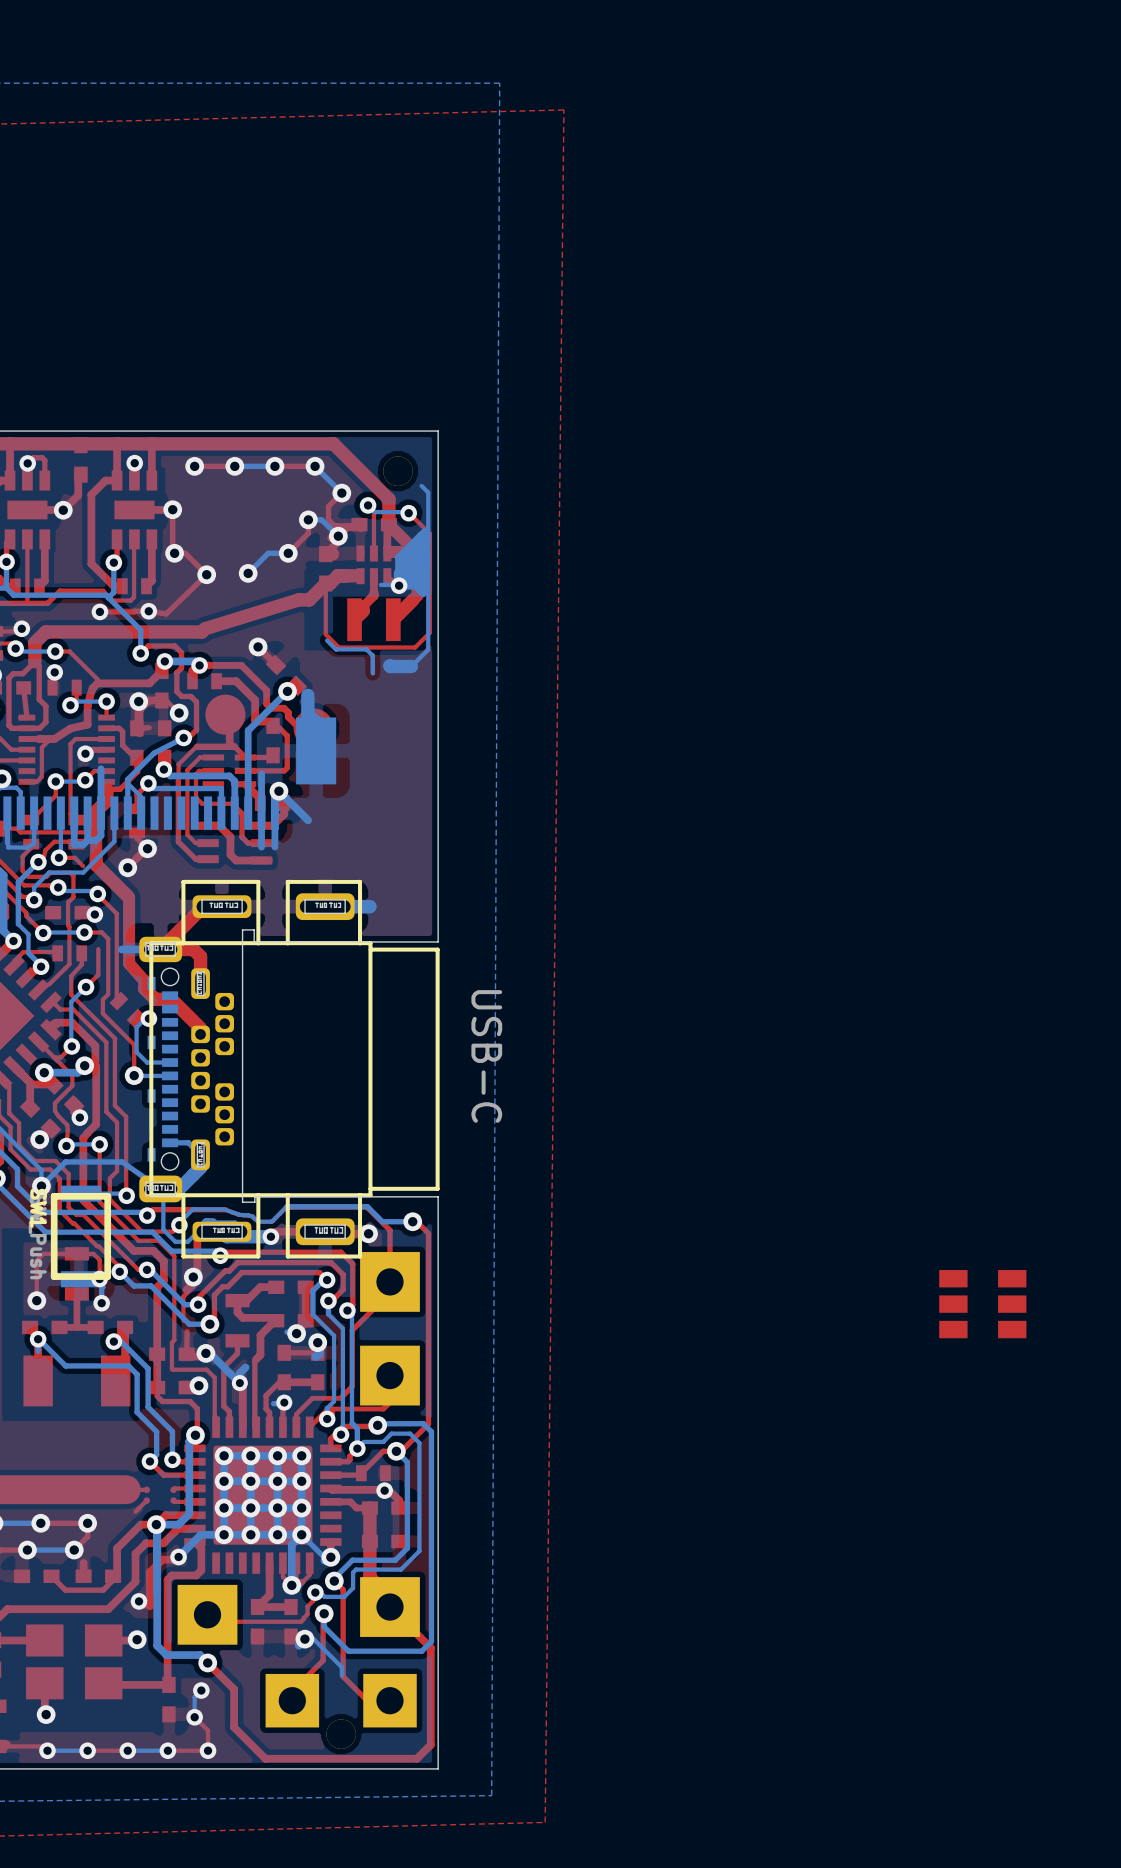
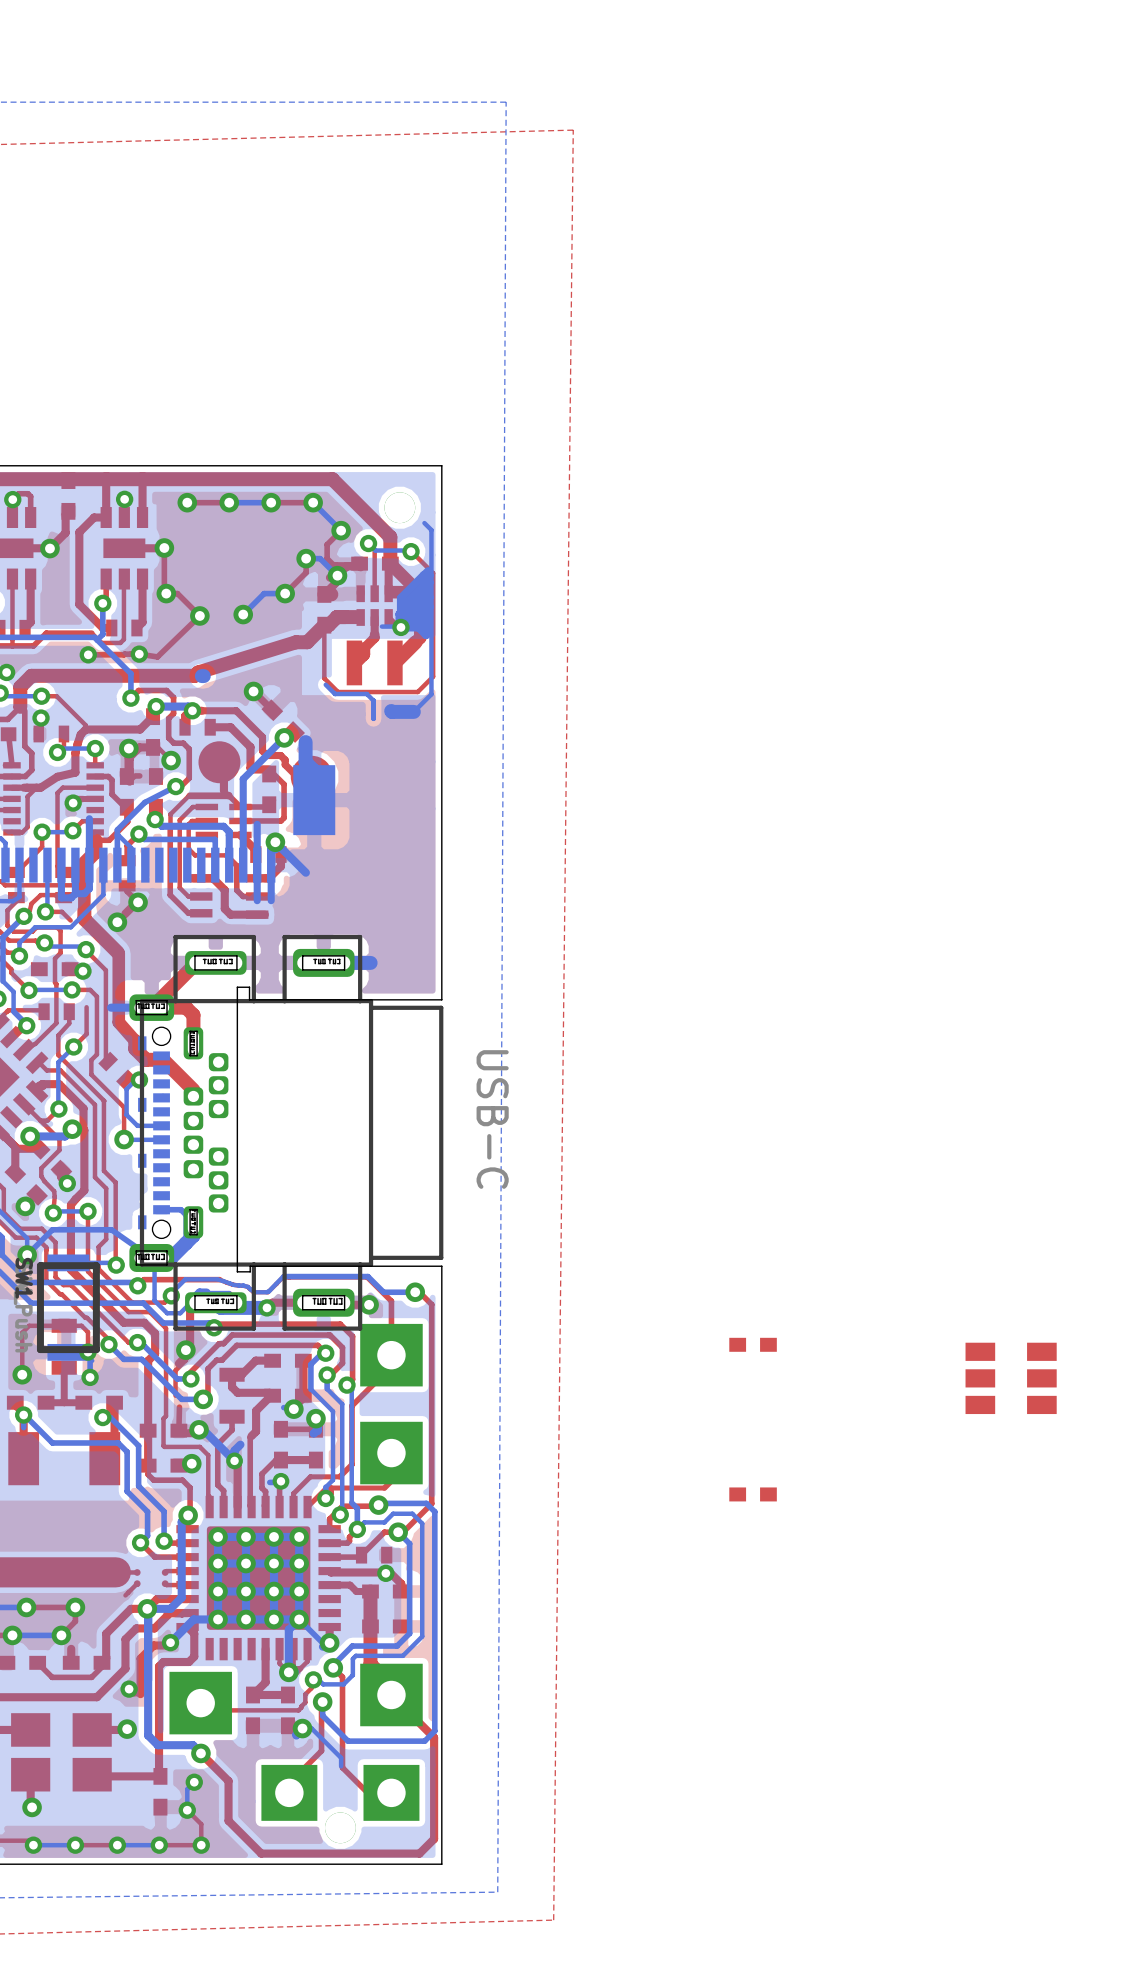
bottom track: none -> (203, 676) (201, 676)
part: none -> (753, 1344)
part: none -> (753, 1494)

